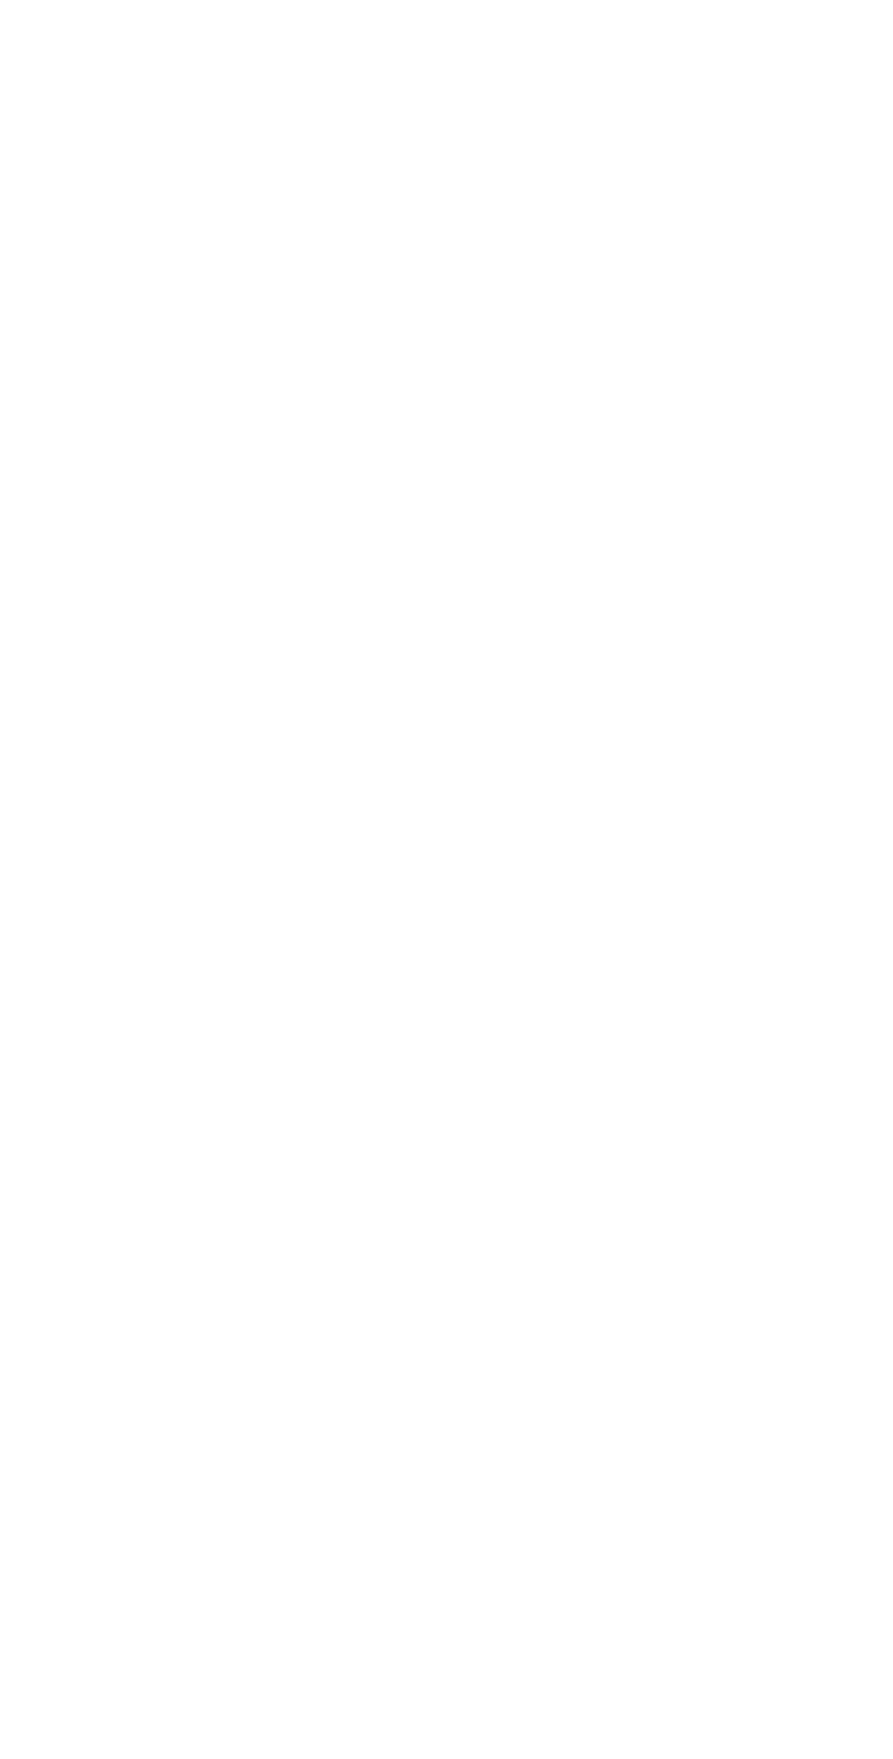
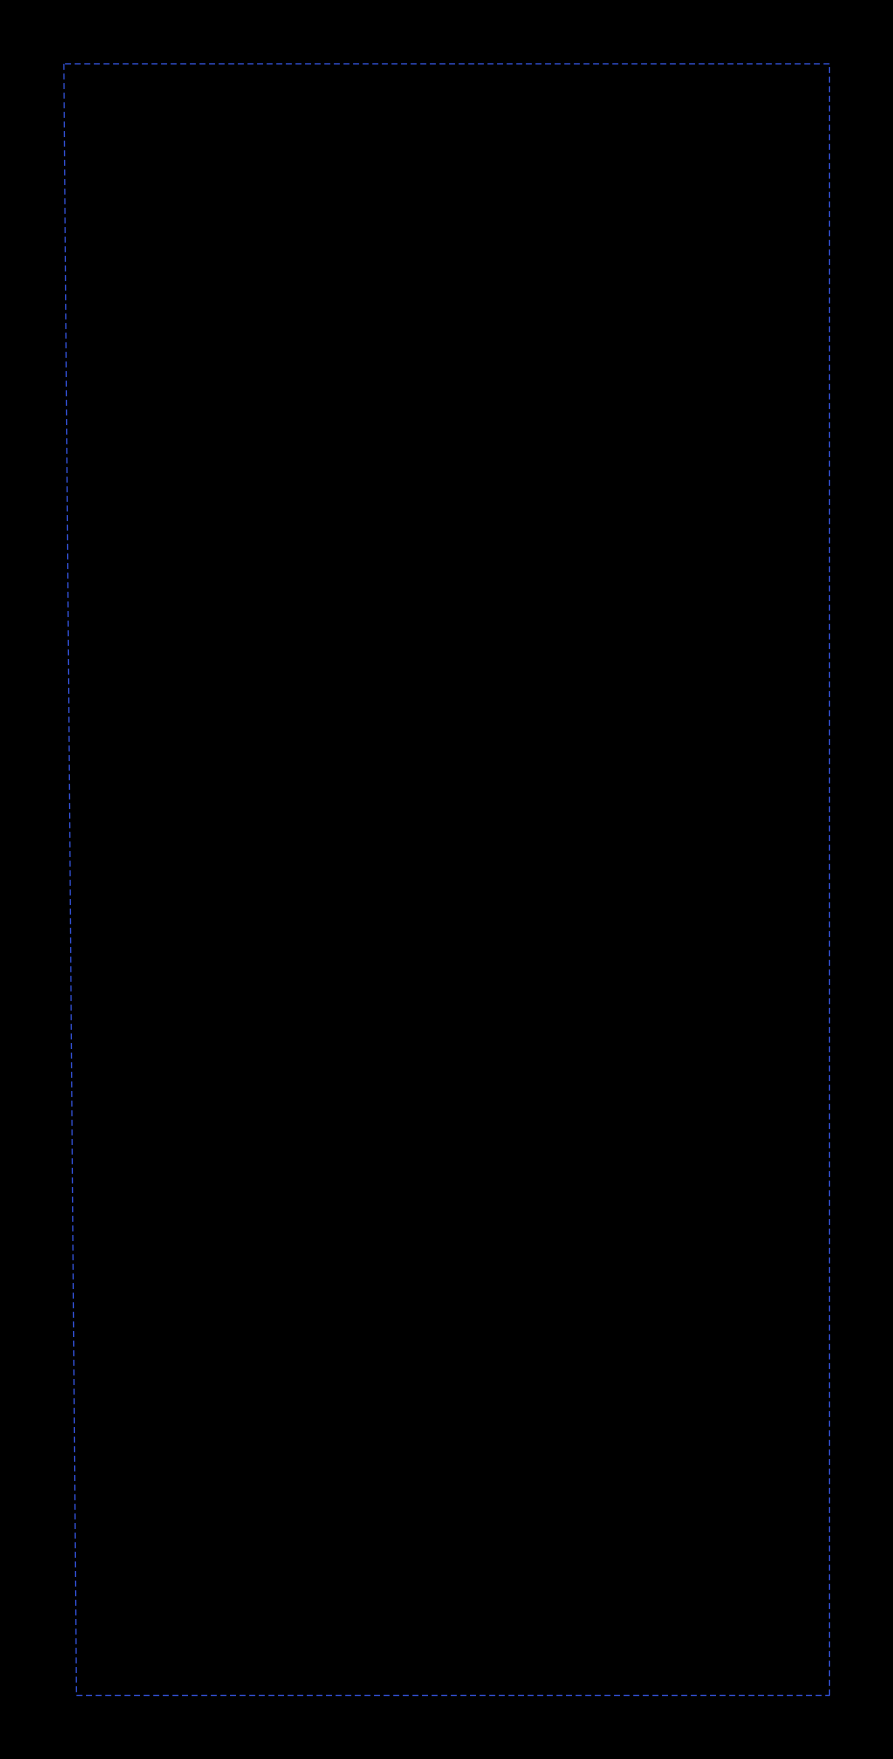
zone outline: none -> (829, 63) (63, 63) (76, 1695) (829, 1695) (829, 63)

